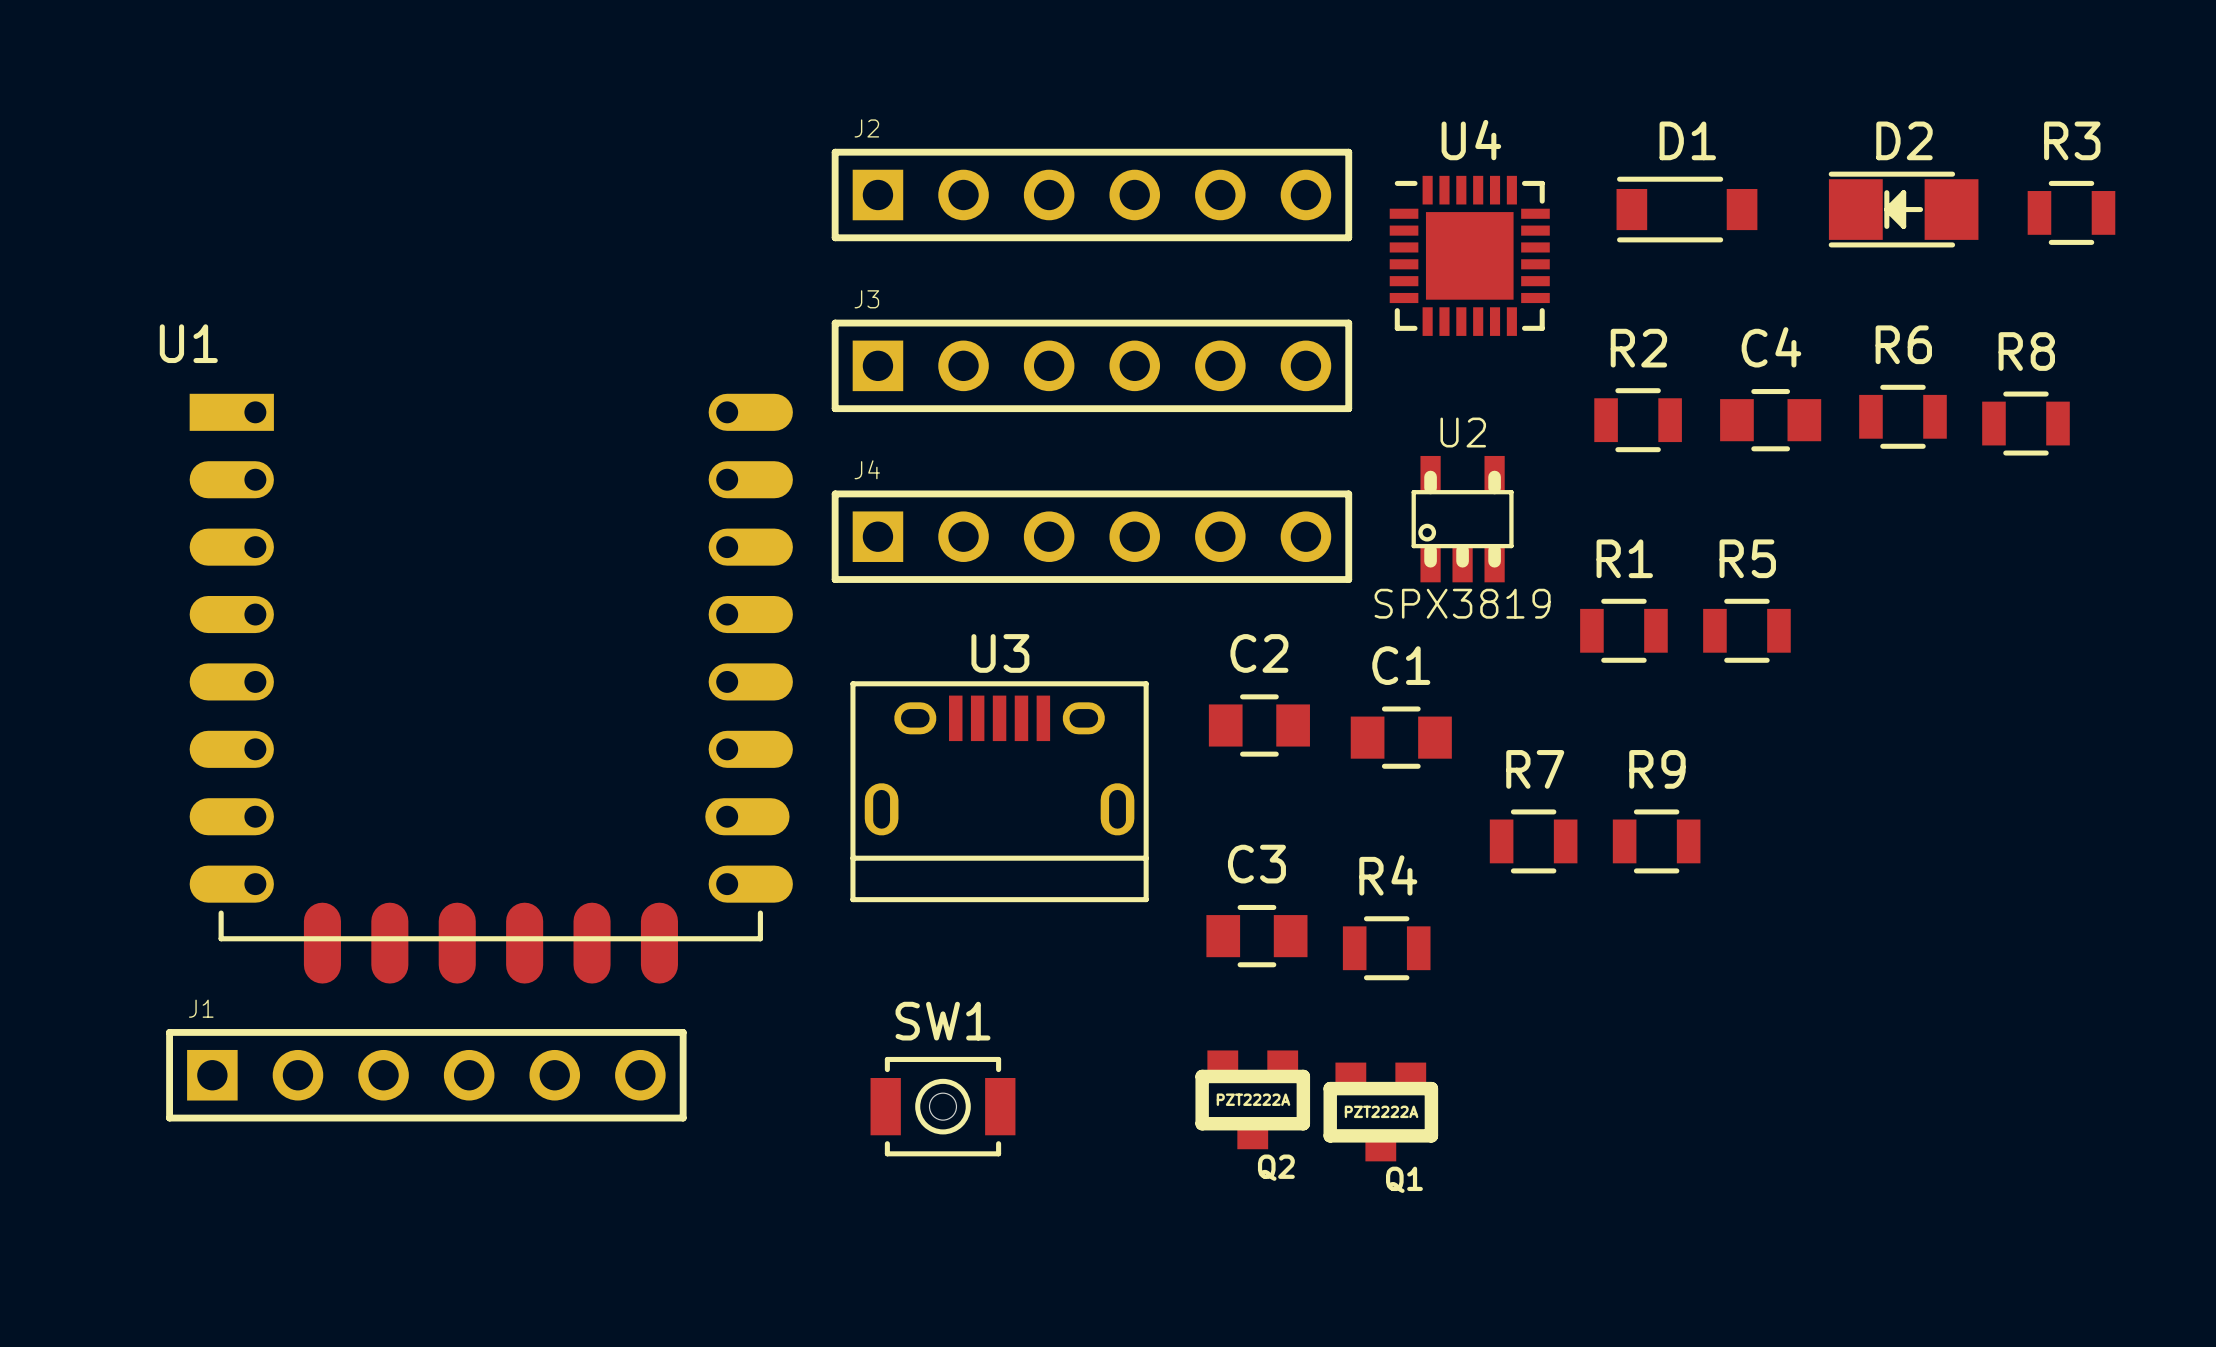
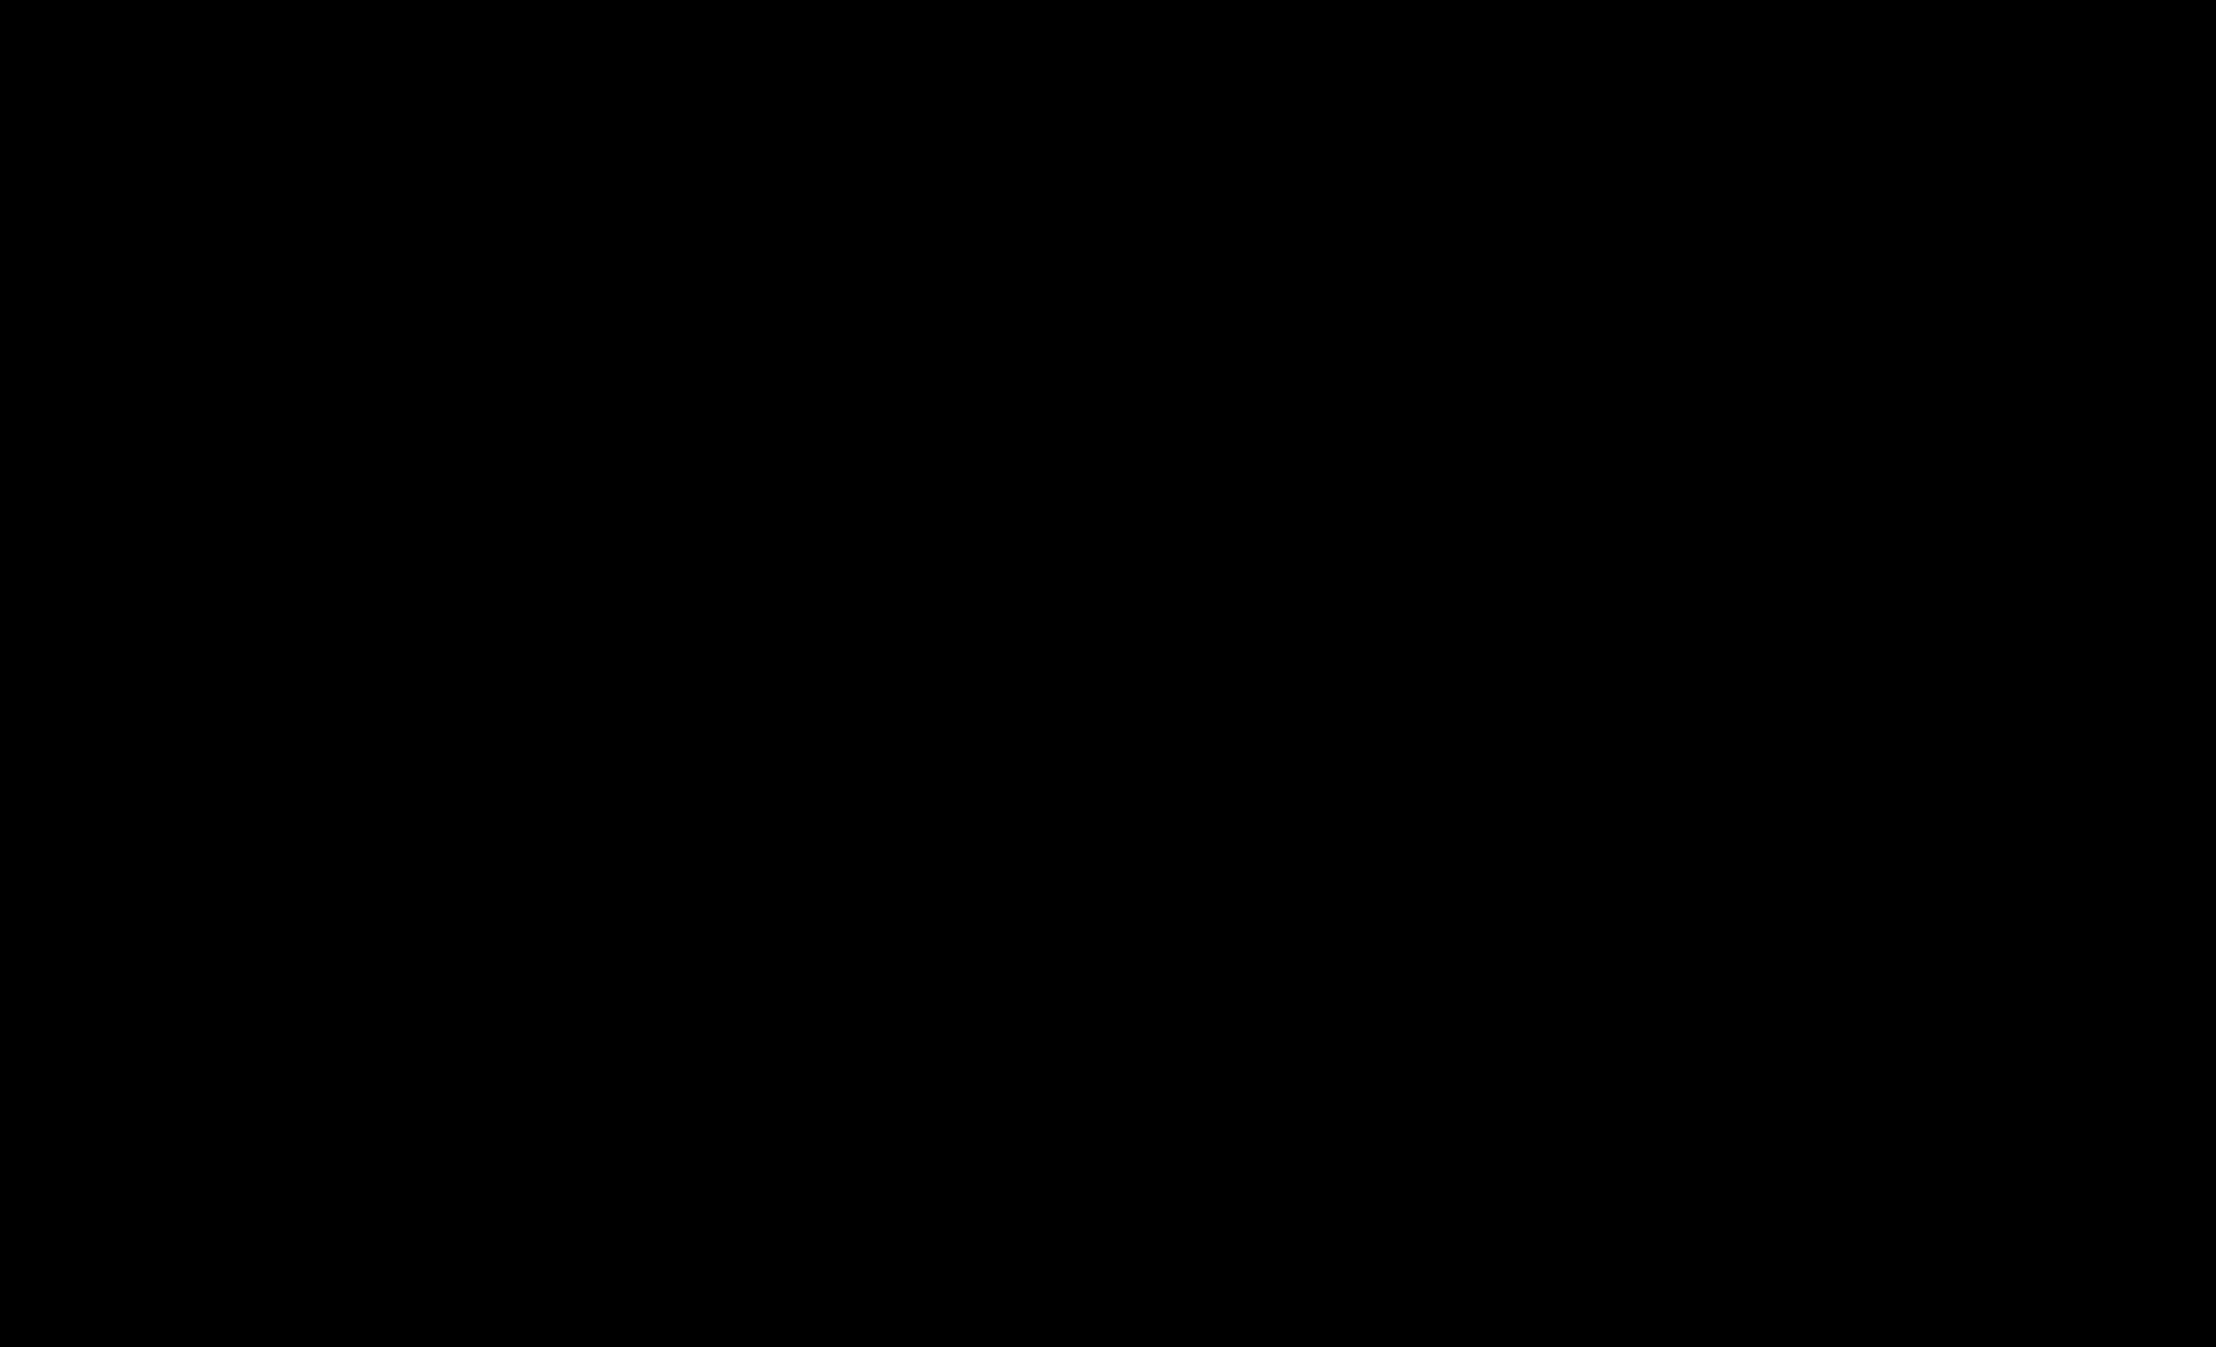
J2: (1091, 194) -> none
D1: (1686, 209) -> none
D2: (1903, 209) -> none
R3: (2071, 212) -> none
U4: (1469, 255) -> none
J3: (1091, 365) -> none
R6: (1902, 416) -> none
R2: (1638, 420) -> none
C4: (1770, 420) -> none
R8: (2025, 423) -> none
U2: SPX3819 (1462, 519) -> none
J4: (1091, 536) -> none
R1: (1623, 630) -> none
R5: (1746, 630) -> none
U1: (491, 688) -> none
C2: (1259, 725) -> none
C1: (1401, 737) -> none
U3: (999, 791) -> none
R7: (1533, 841) -> none
R9: (1656, 841) -> none
C3: (1256, 936) -> none
R4: (1386, 948) -> none
J1: (426, 1075) -> none
Q2: PZT2222A (1252, 1099) -> none
SW1: (942, 1106) -> none
Q1: PZT2222A (1380, 1111) -> none

